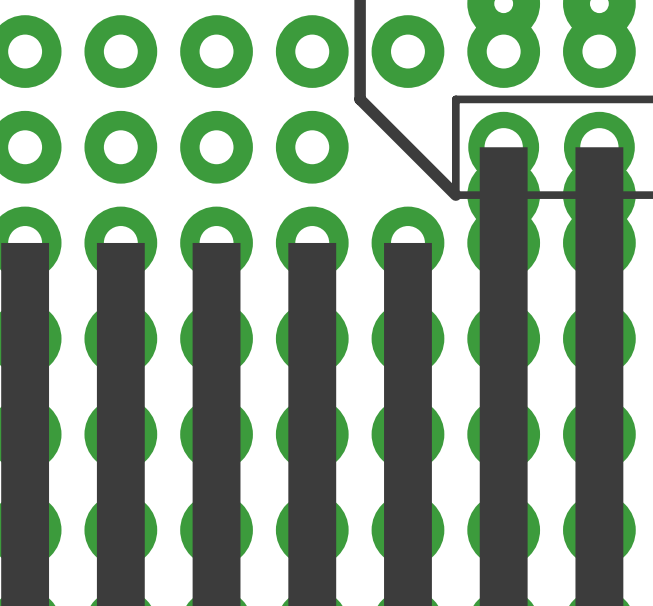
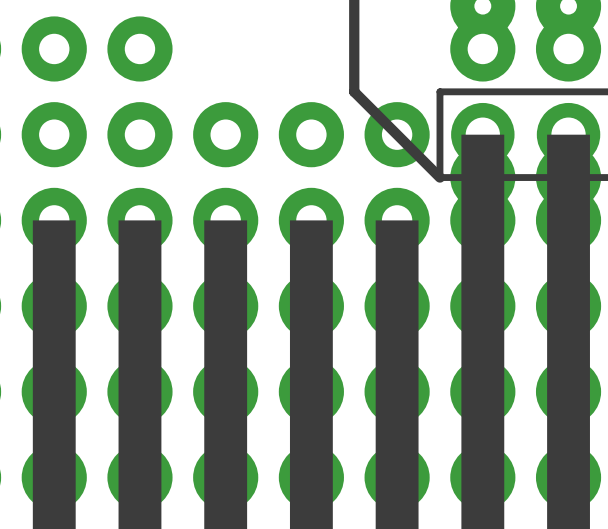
via: (216, 51) -> none
via: (312, 51) -> none
via: (407, 51) -> none
via: none -> (397, 134)

